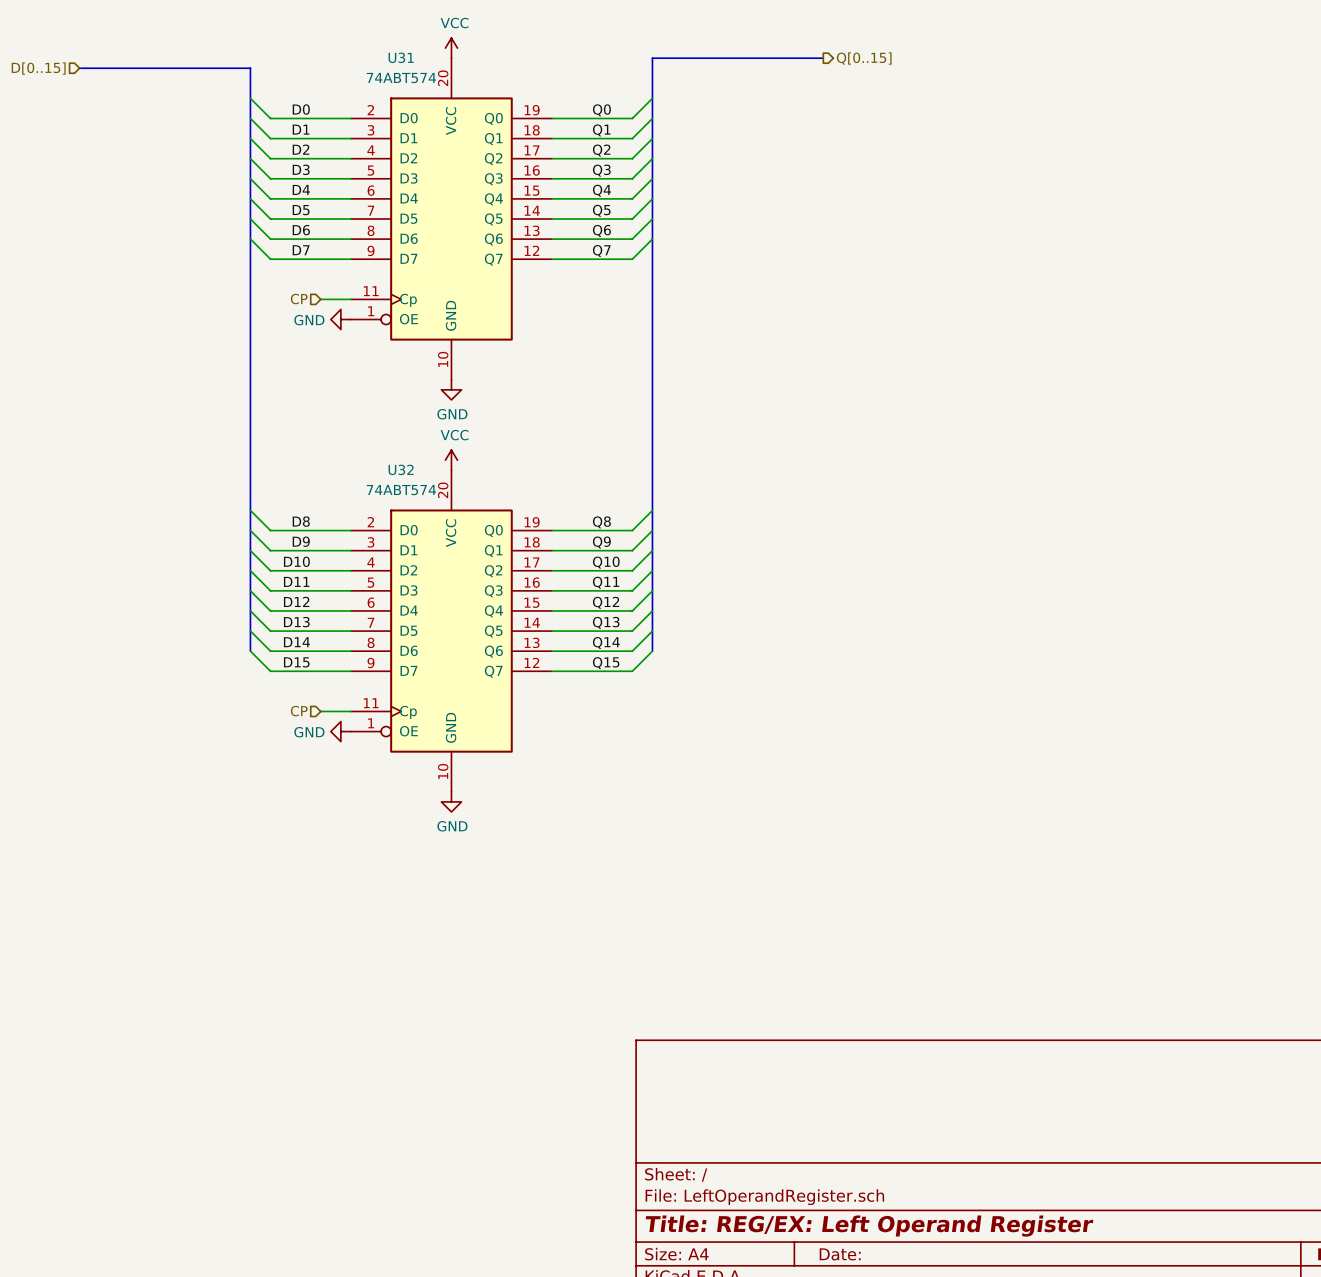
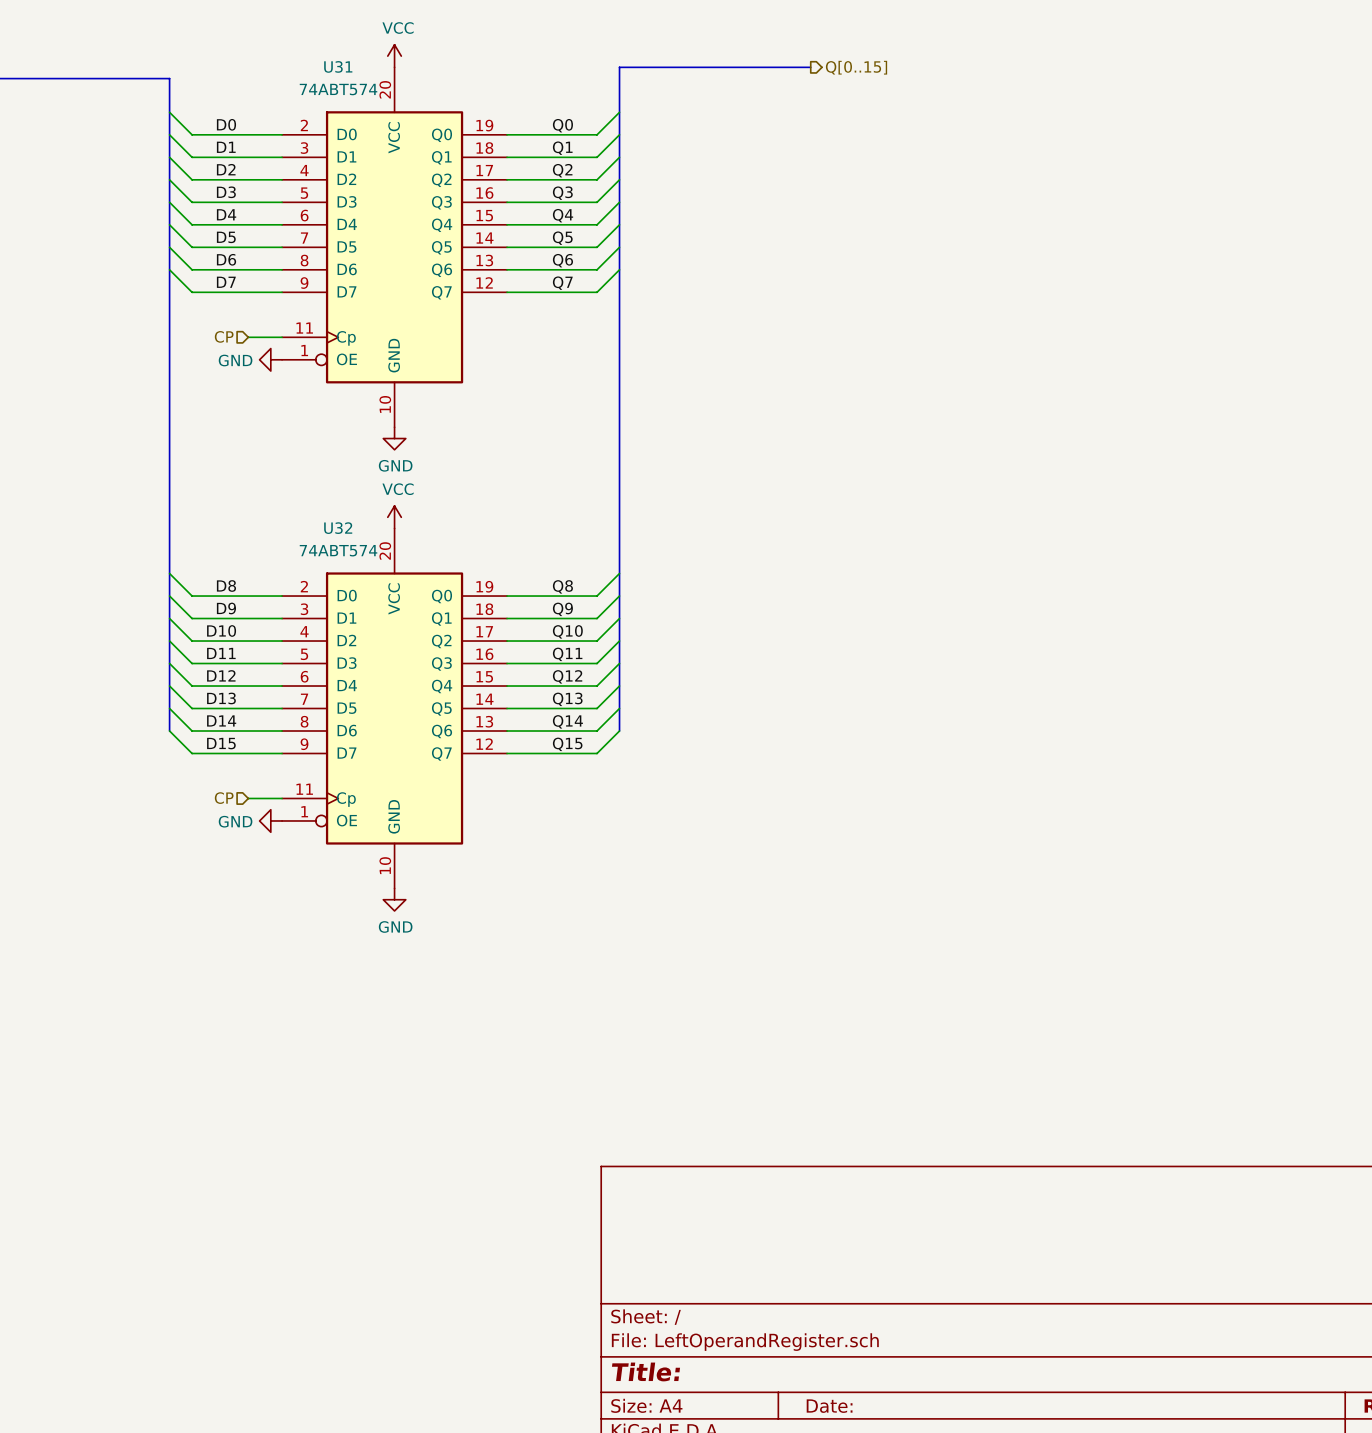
title block: Title: REG/EX: Left Operand Register (869, 1226) -> Title: (646, 1371)

